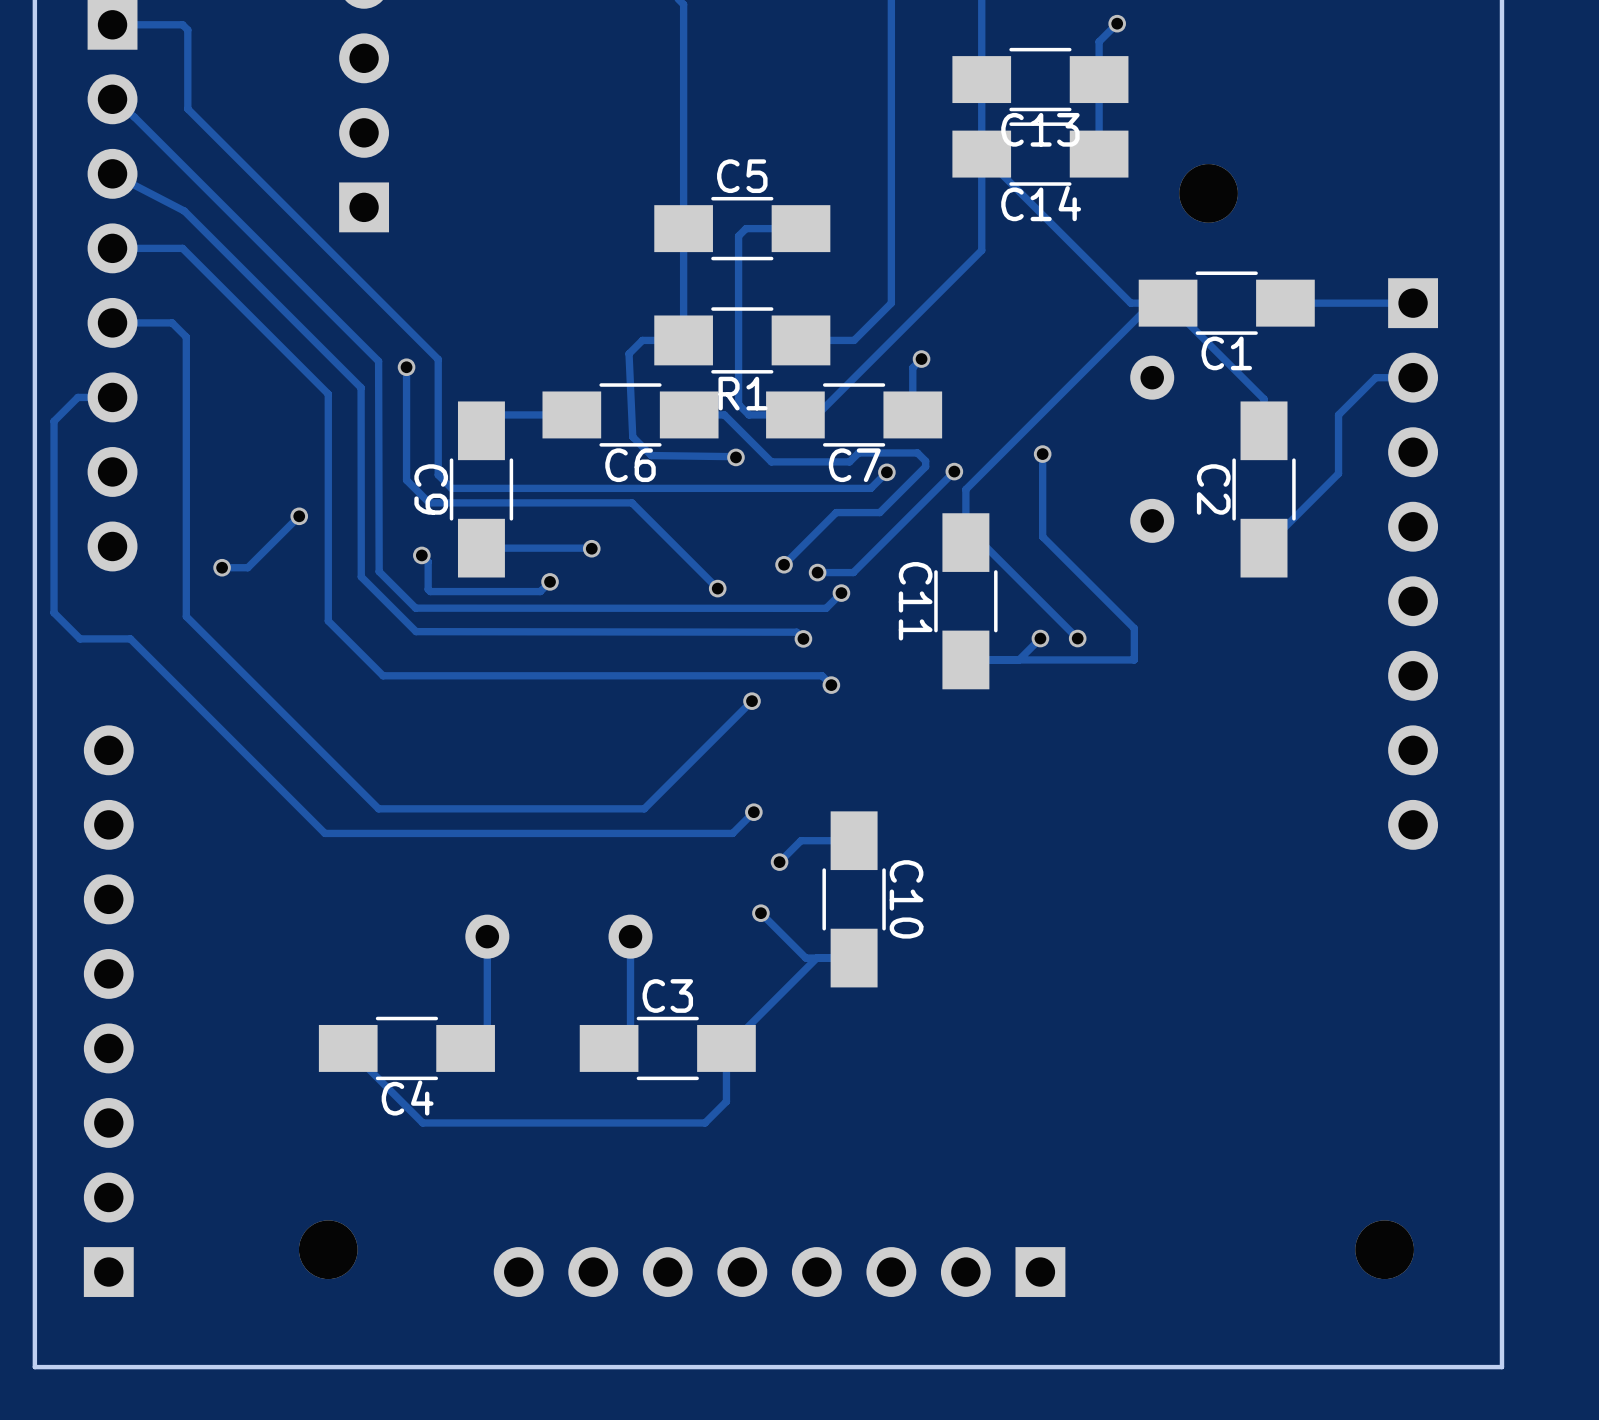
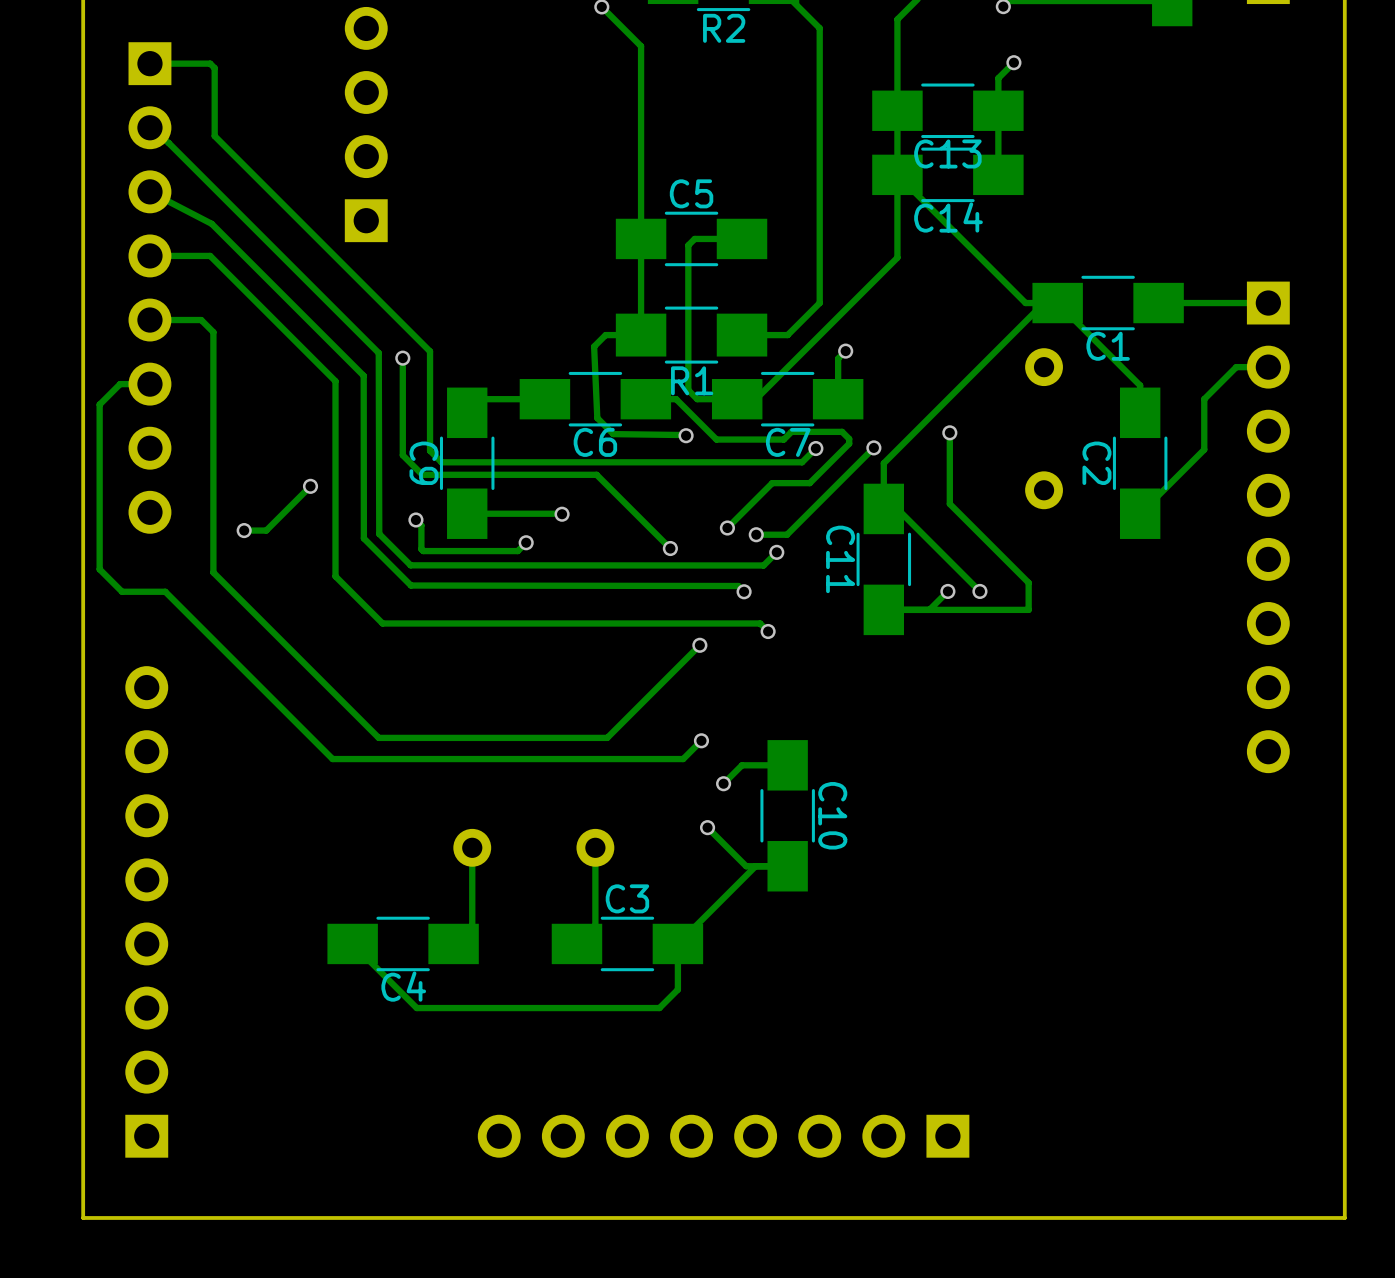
part: (1208, 193) -> none
part: (328, 1249) -> none
part: (1384, 1249) -> none

